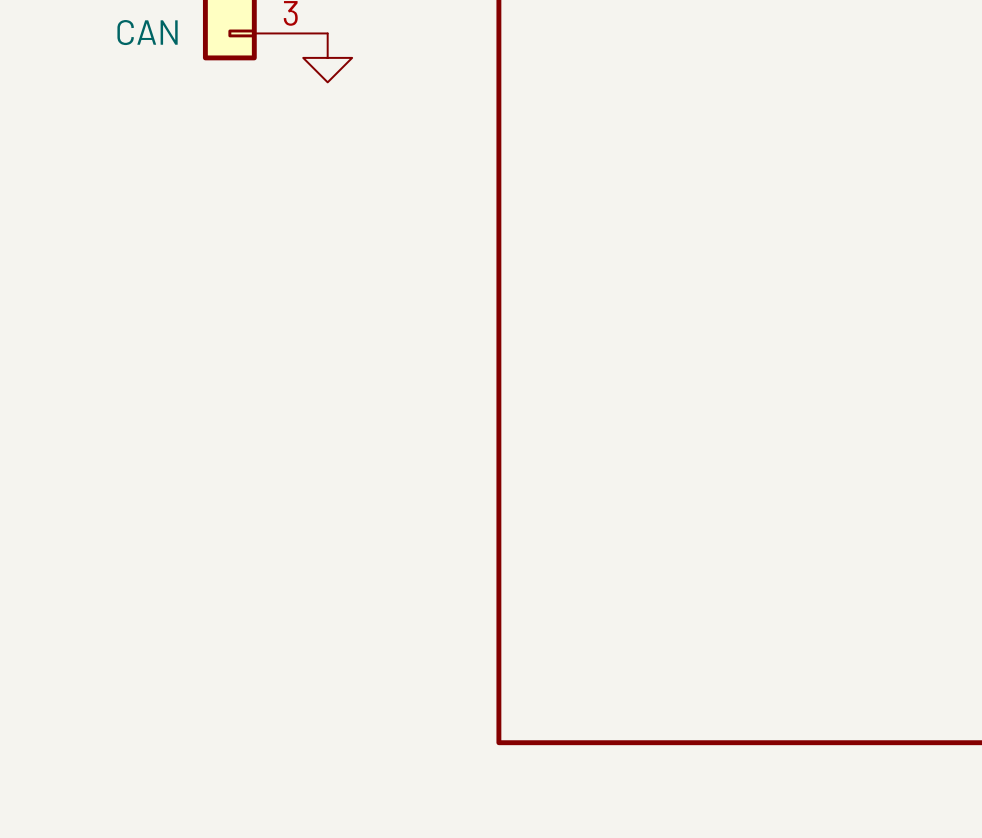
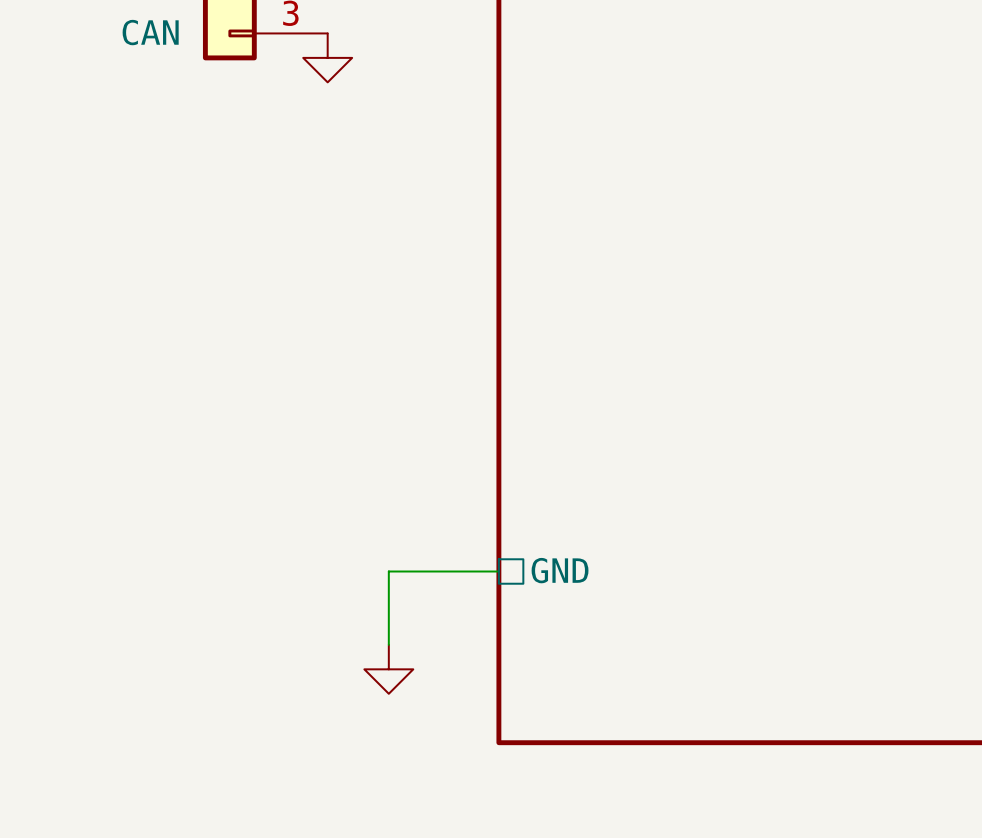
sheet pin: none -> GND (560, 570)
wire: none -> (498, 571) (388, 571) (388, 644)
power symbol: none -> (388, 669)

